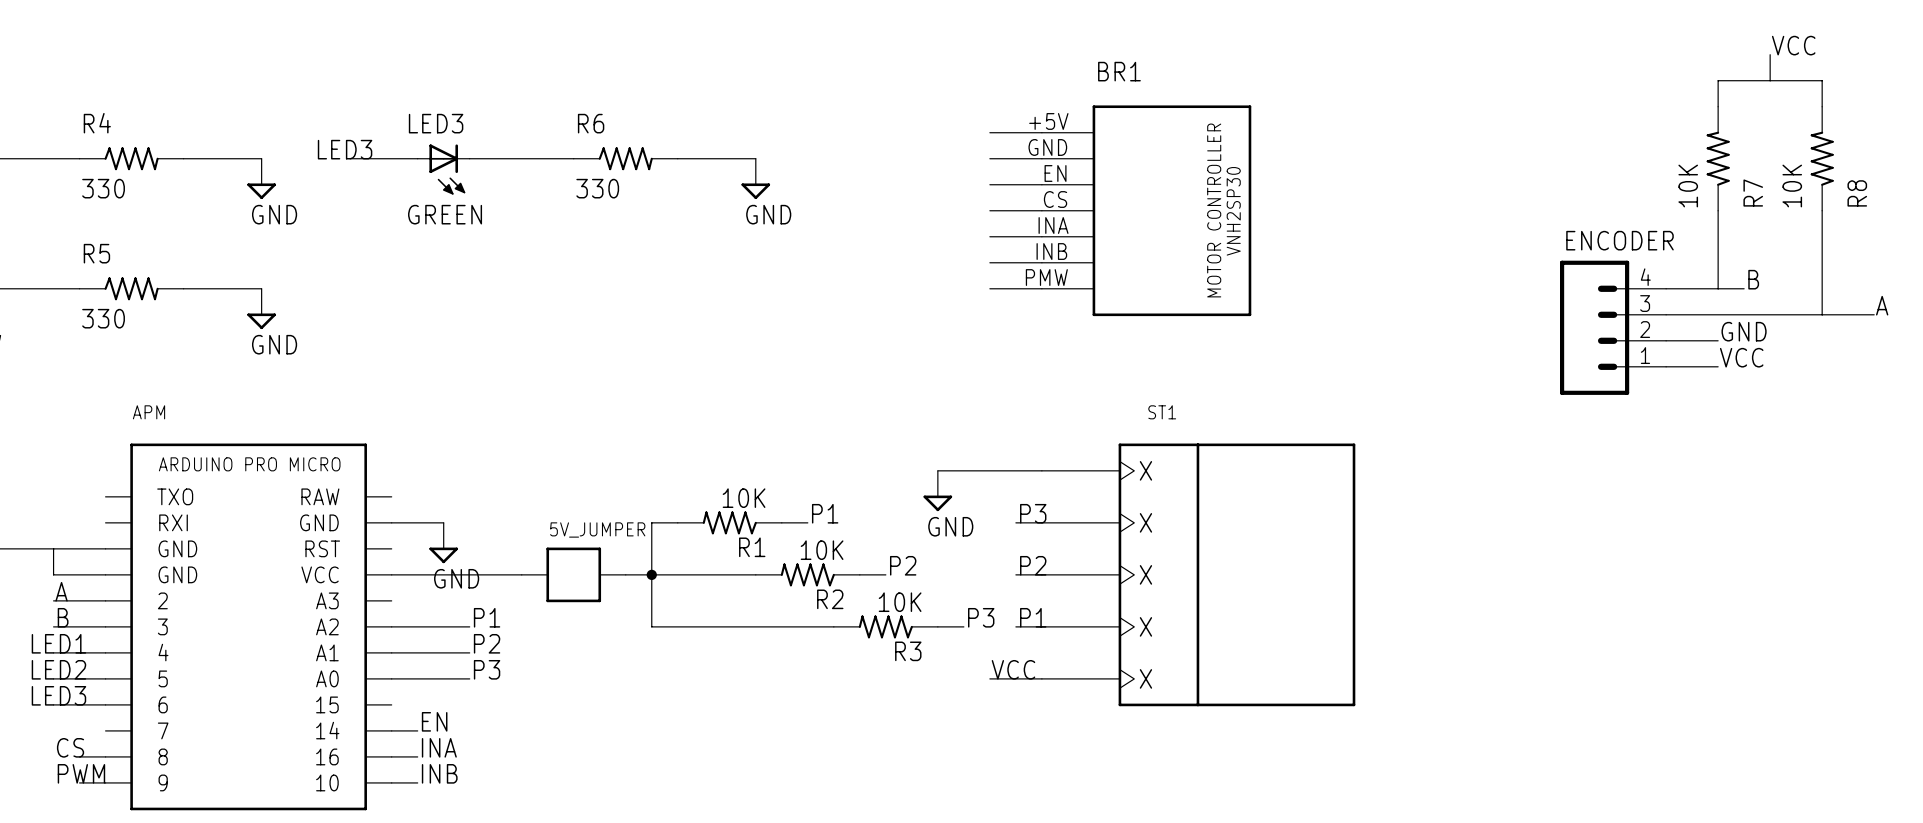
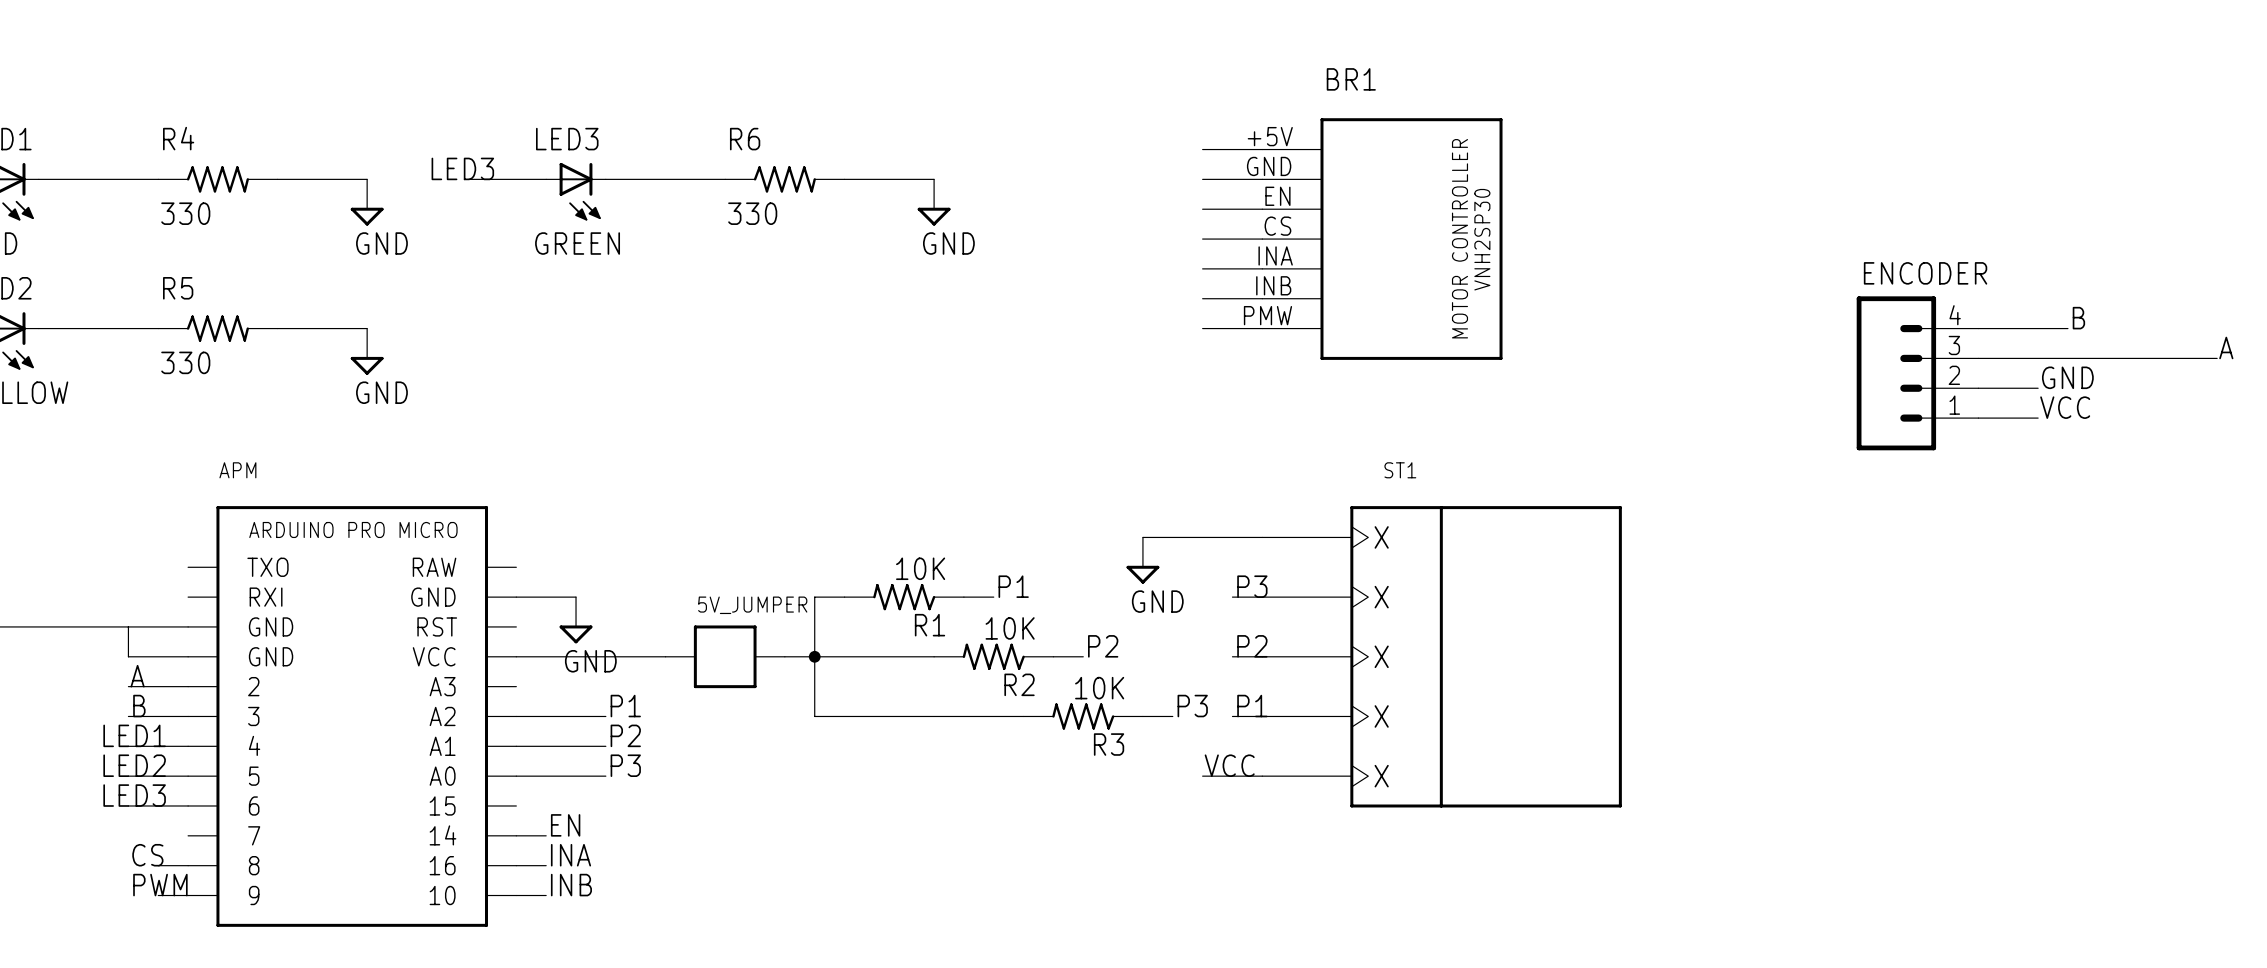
label: VCC (1793, 45) -> none
wire: (1770, 54) (1770, 80) -> none
wire: (1718, 106) (1718, 80) (1822, 80) (1822, 106) -> none
R7: 10K (1718, 158) -> none
R8: 10K (1822, 158) -> none
wire: (1718, 210) (1718, 288) -> none
wire: (1822, 210) (1822, 314) -> none

